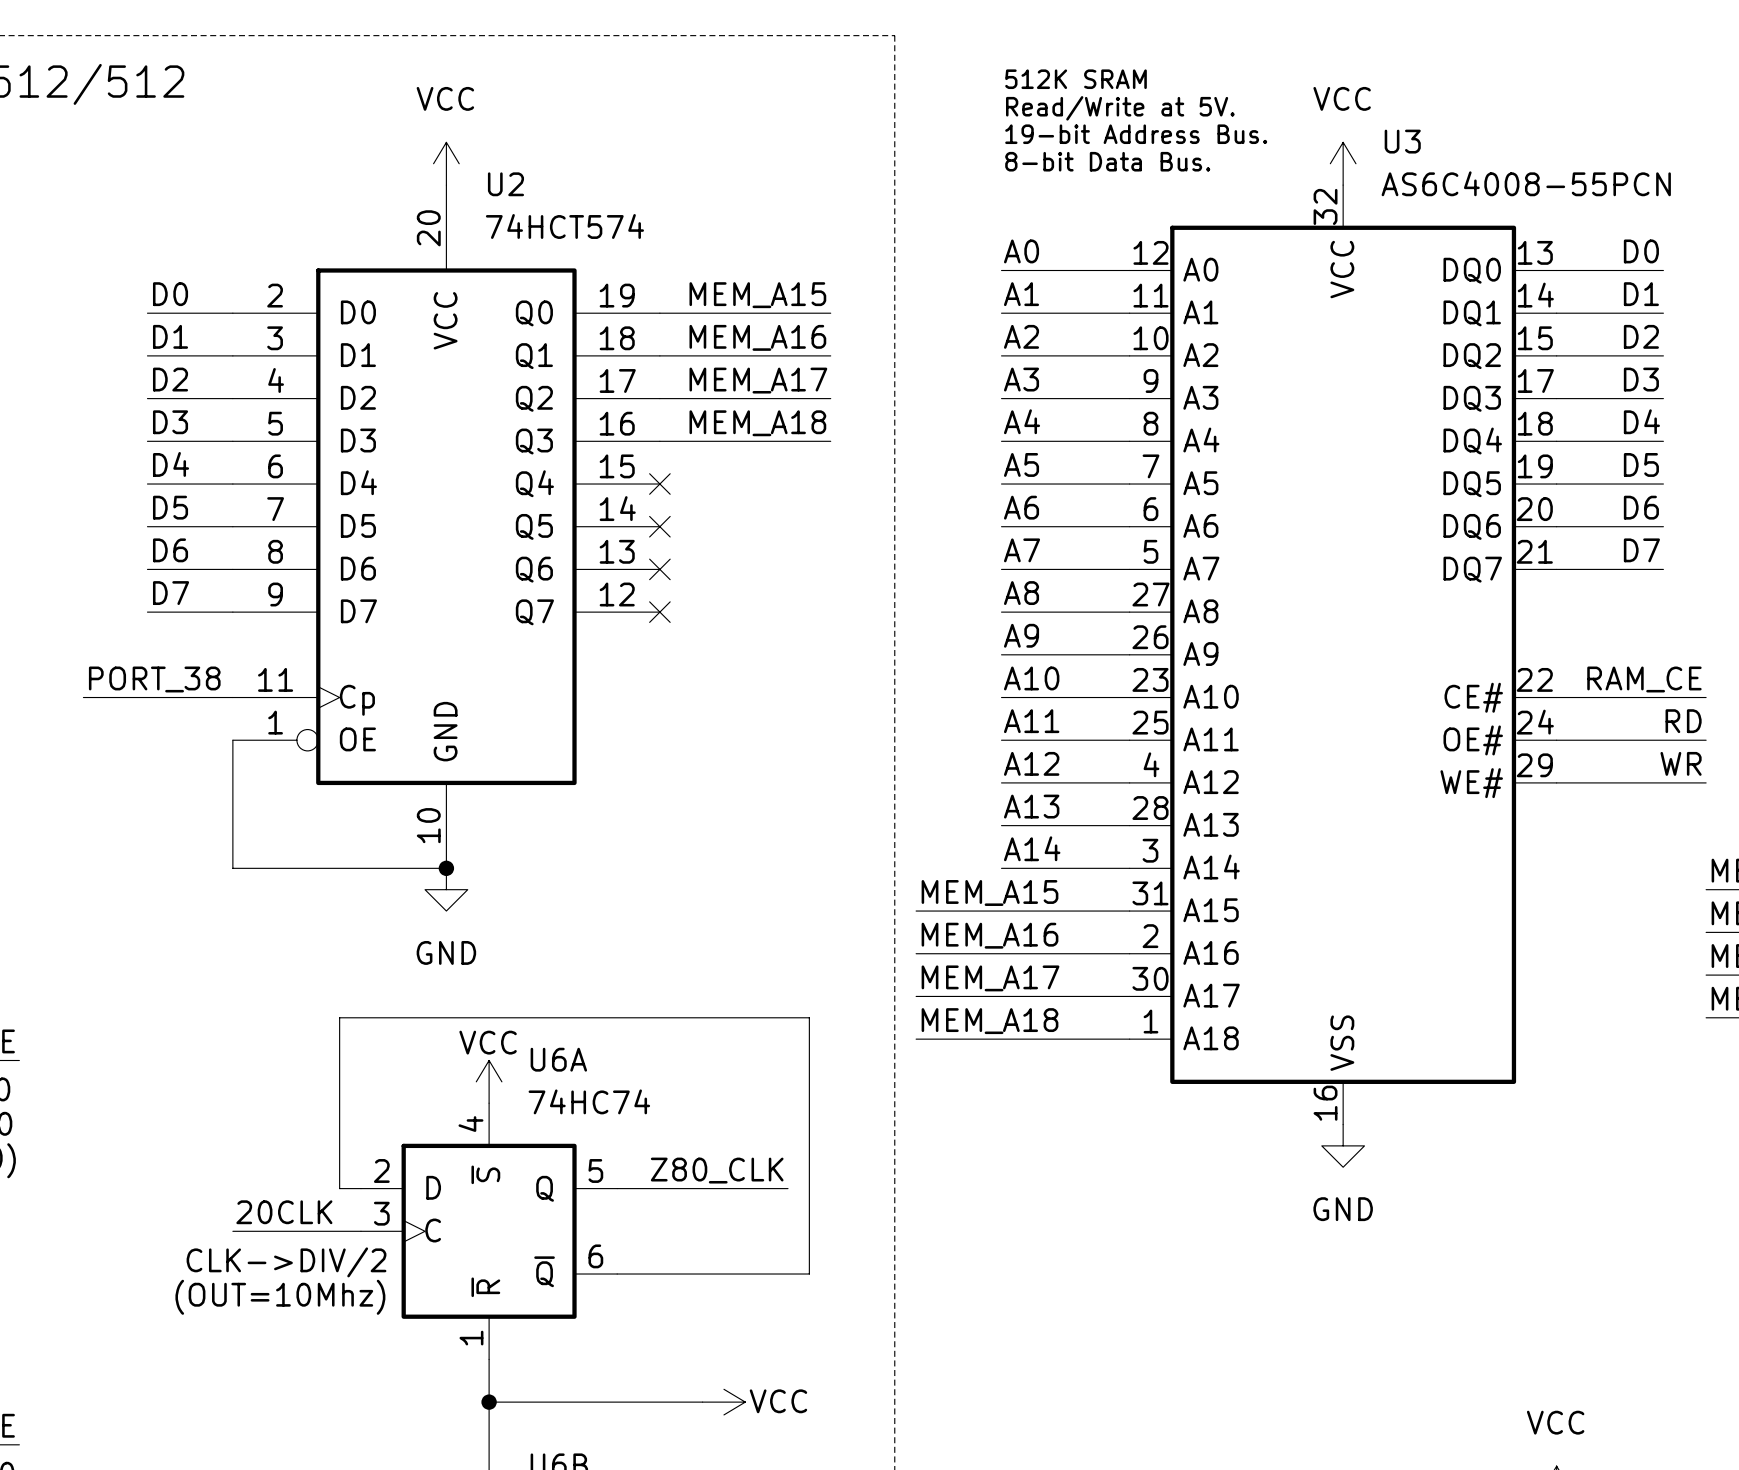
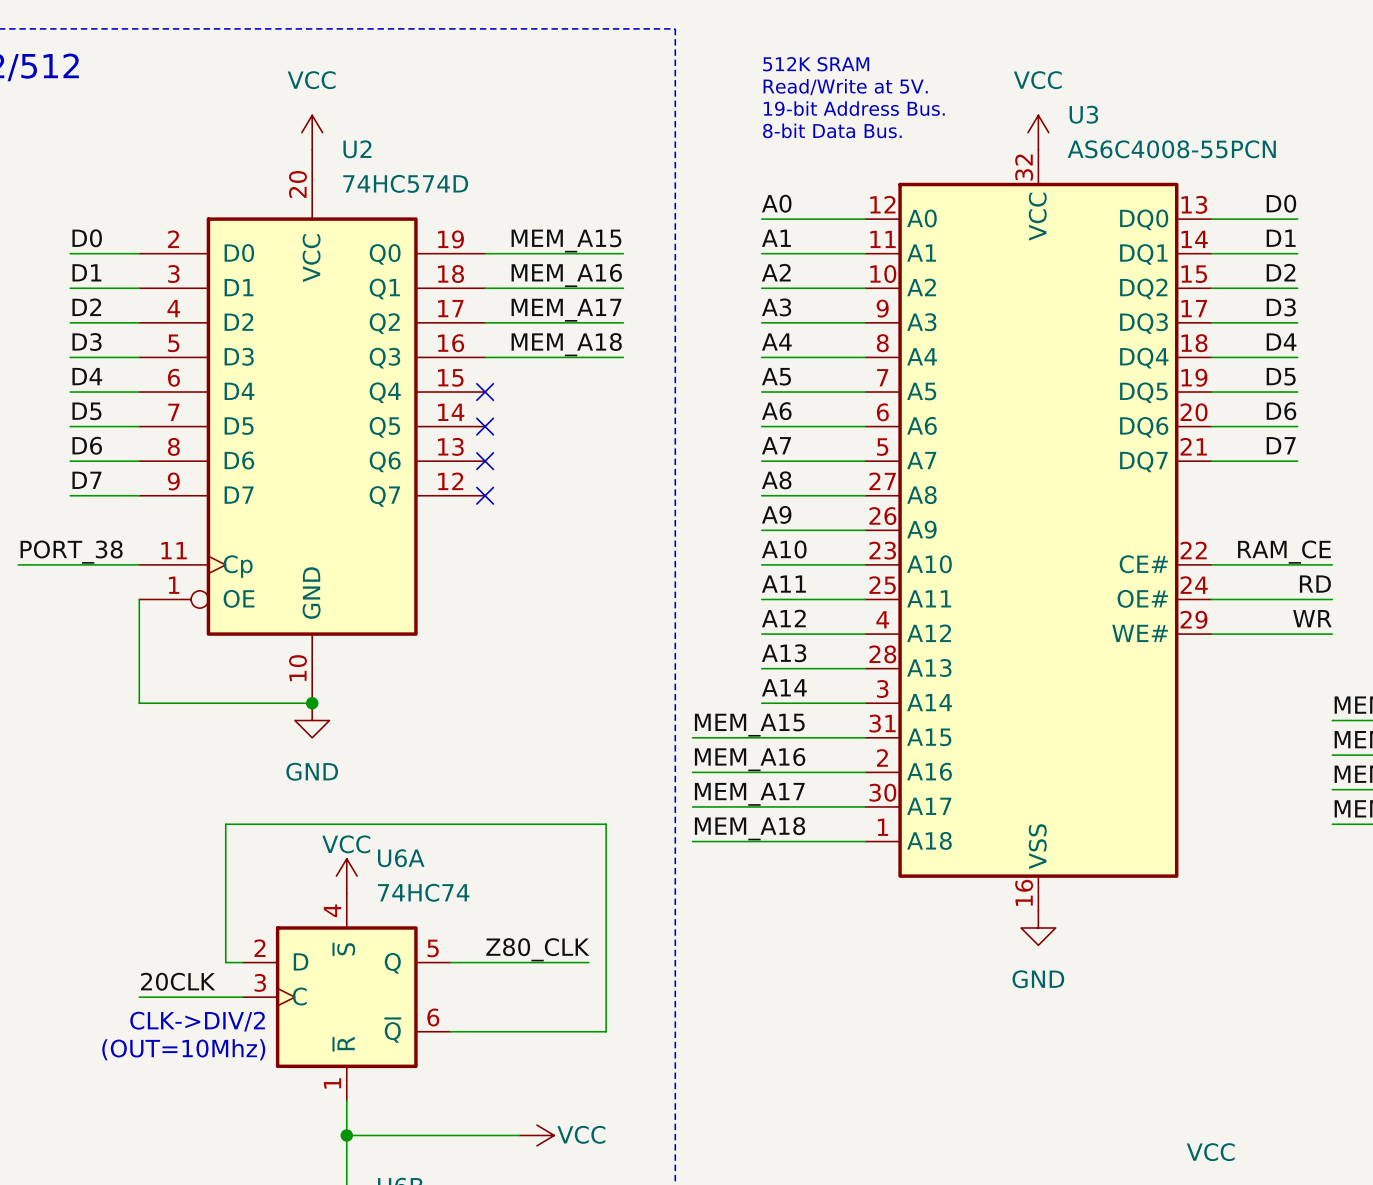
U2 value: 74HCT574 (564, 226) -> 74HC574D (405, 183)

